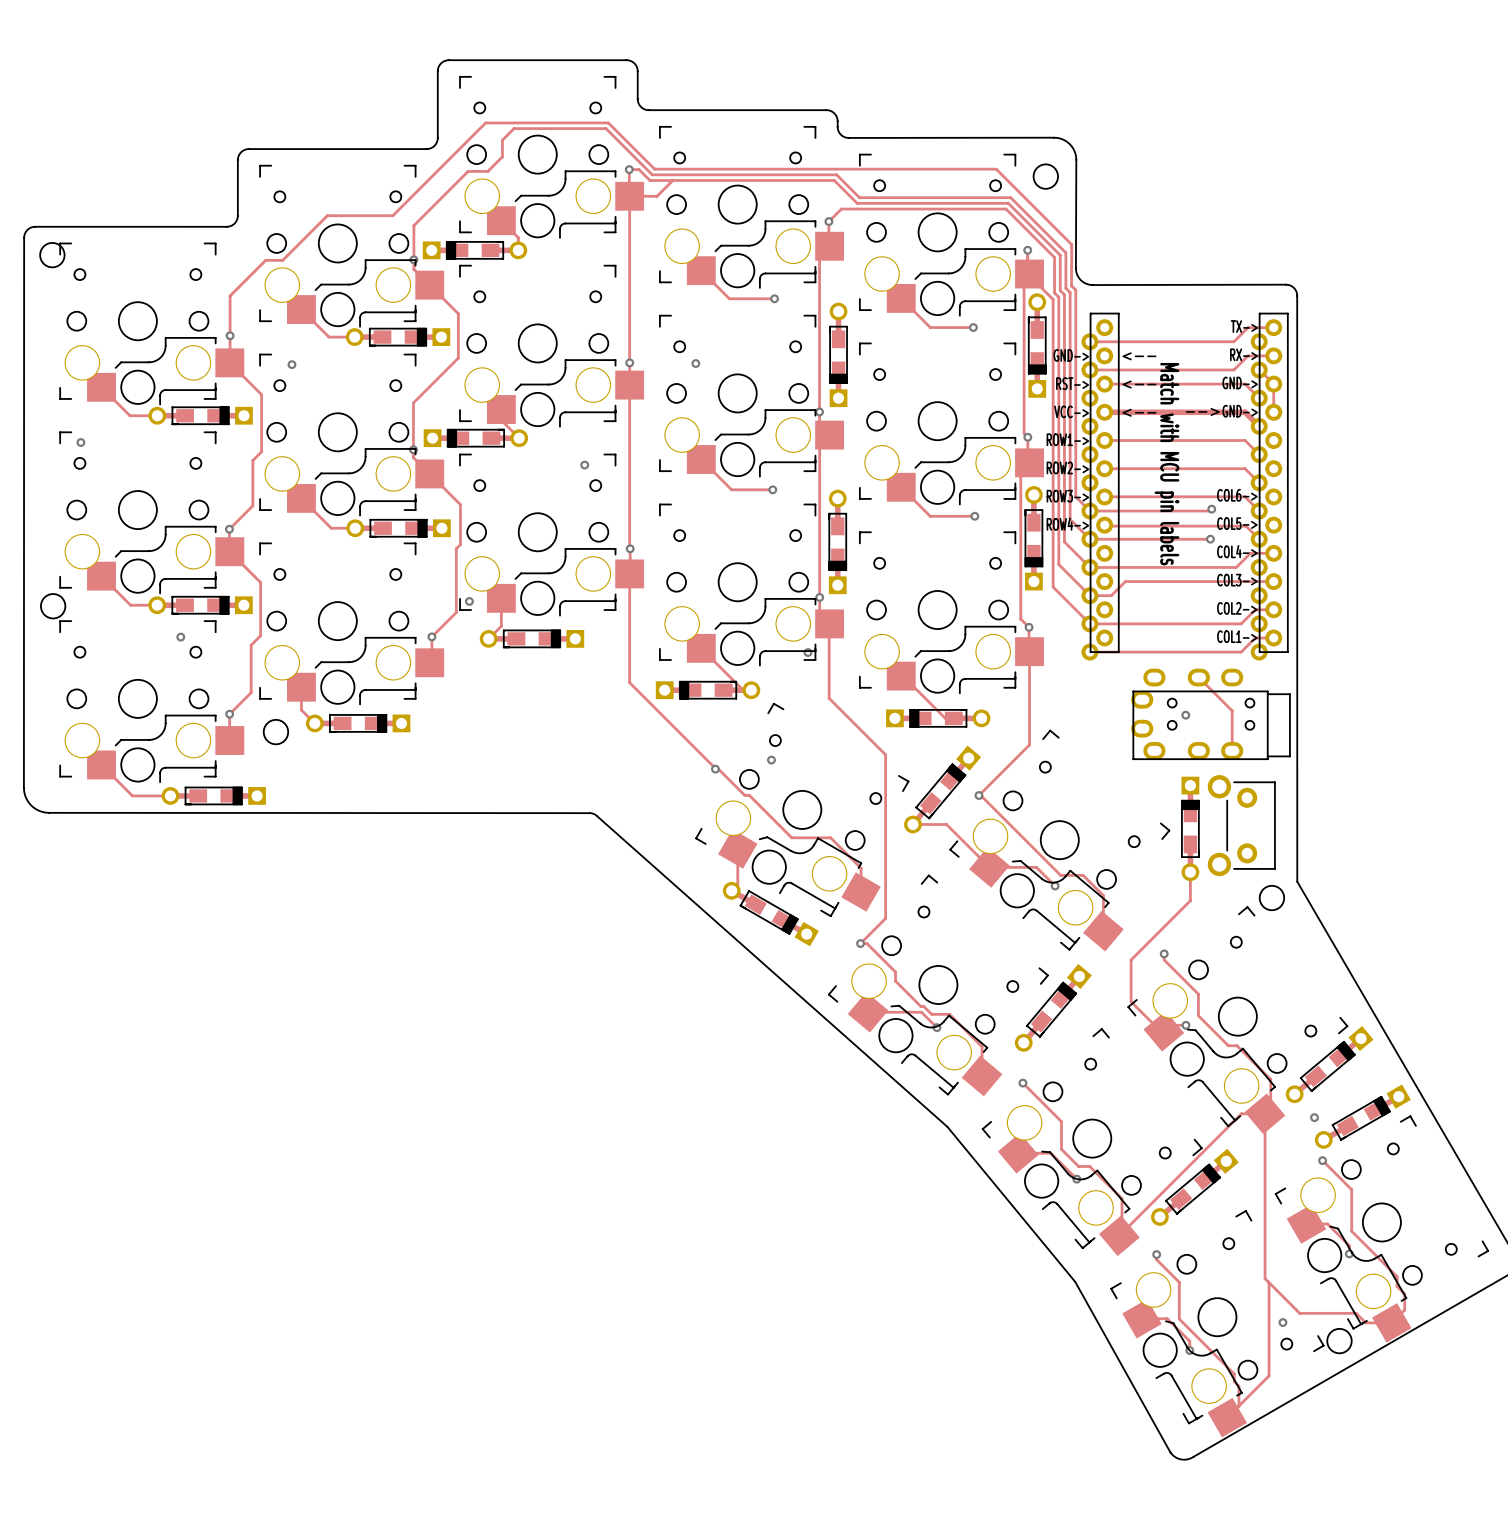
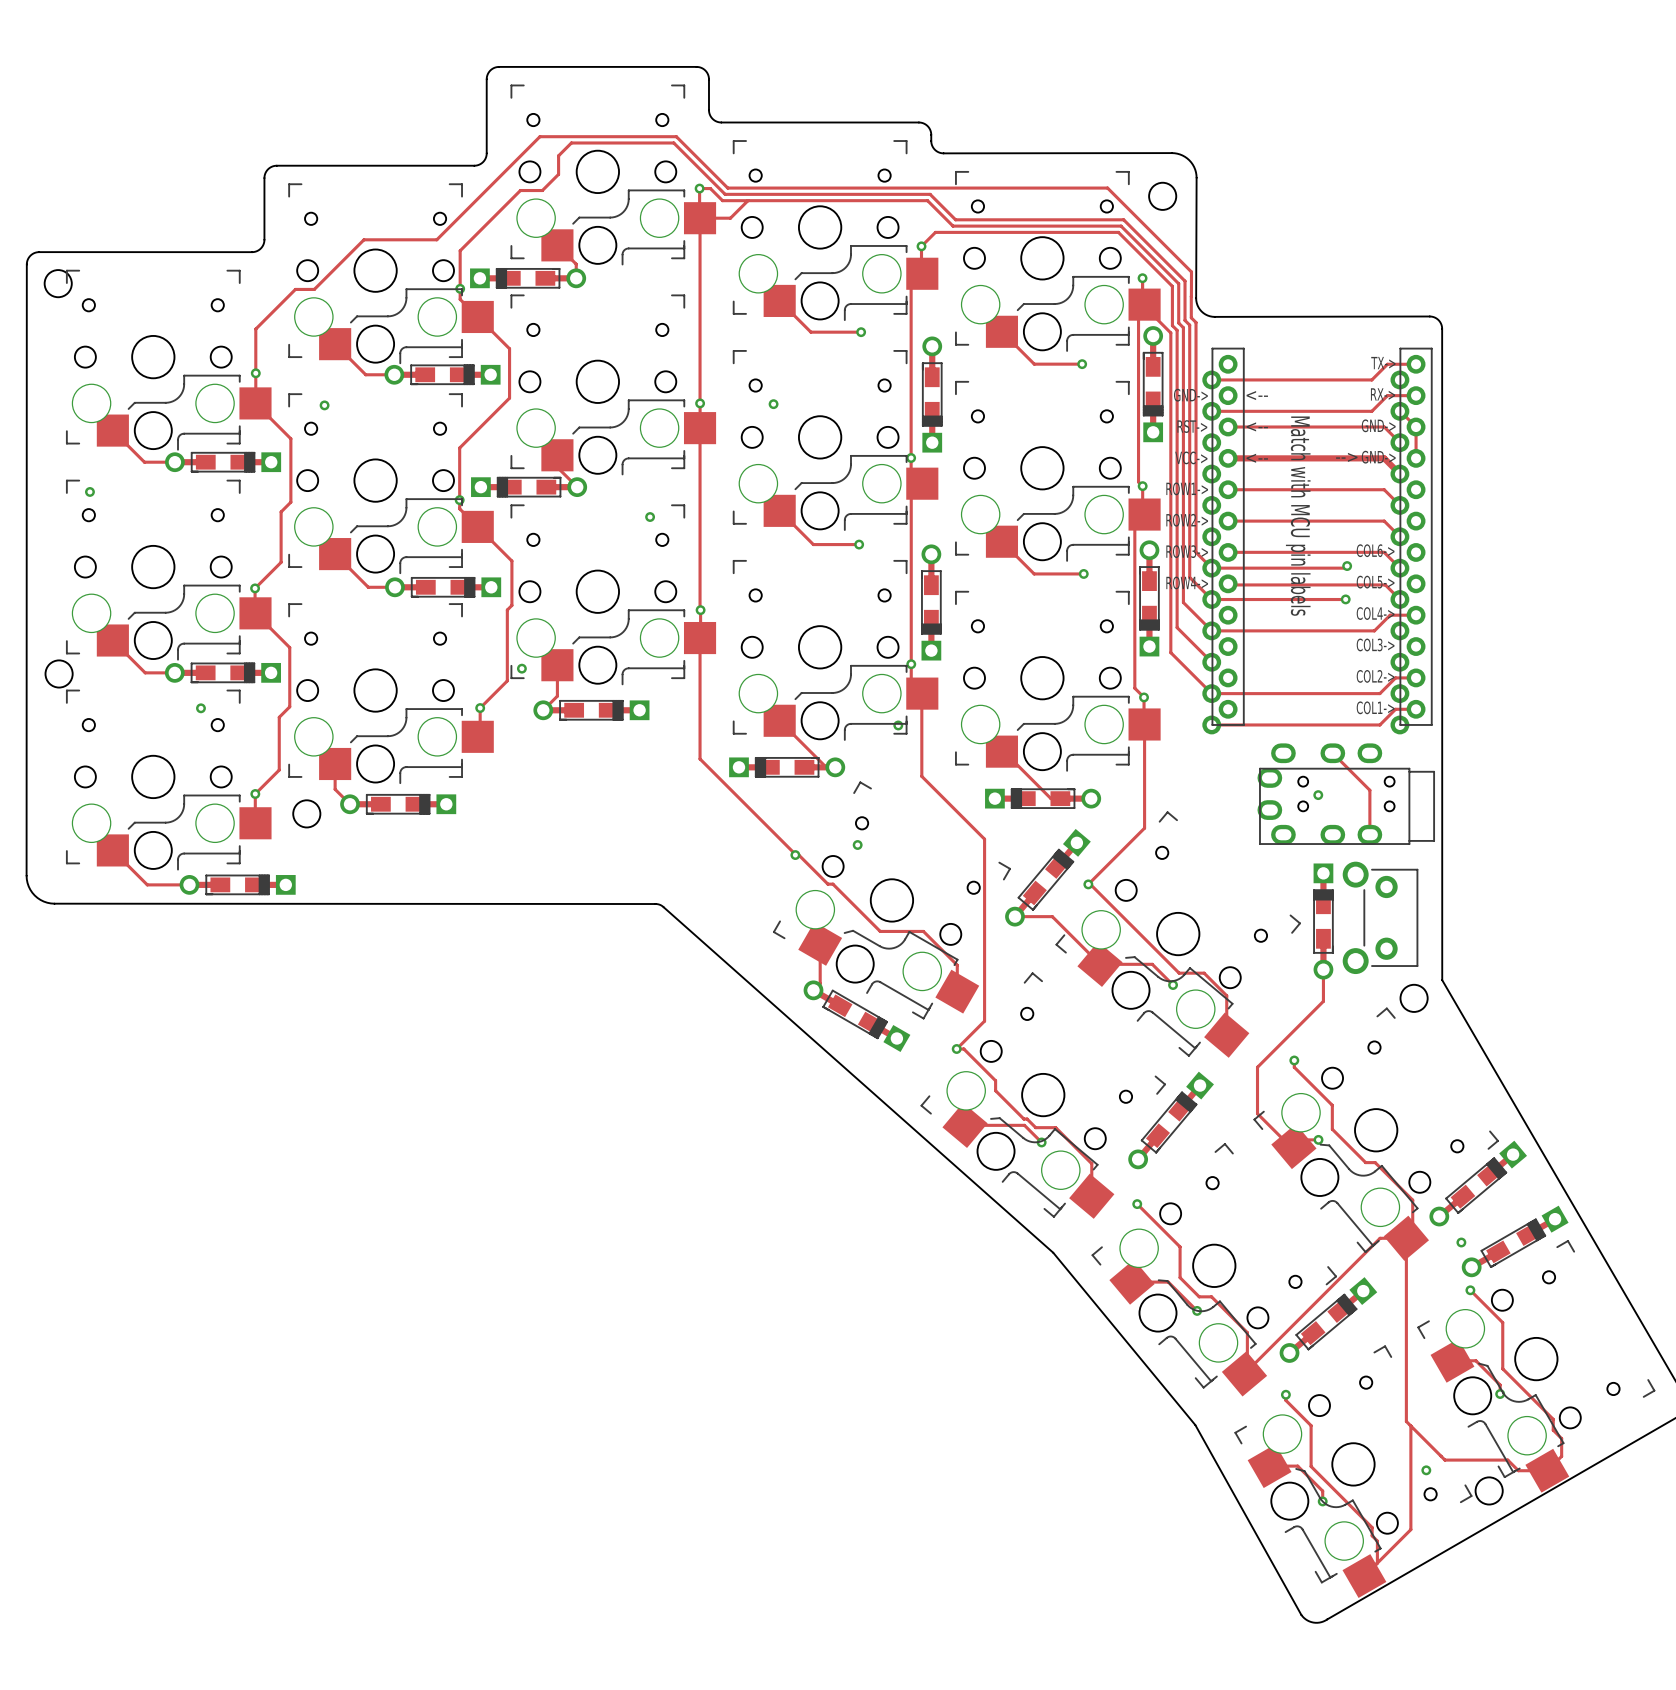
track: (1273, 581) (1125, 581) (1111, 595) (1089, 595) -> none

